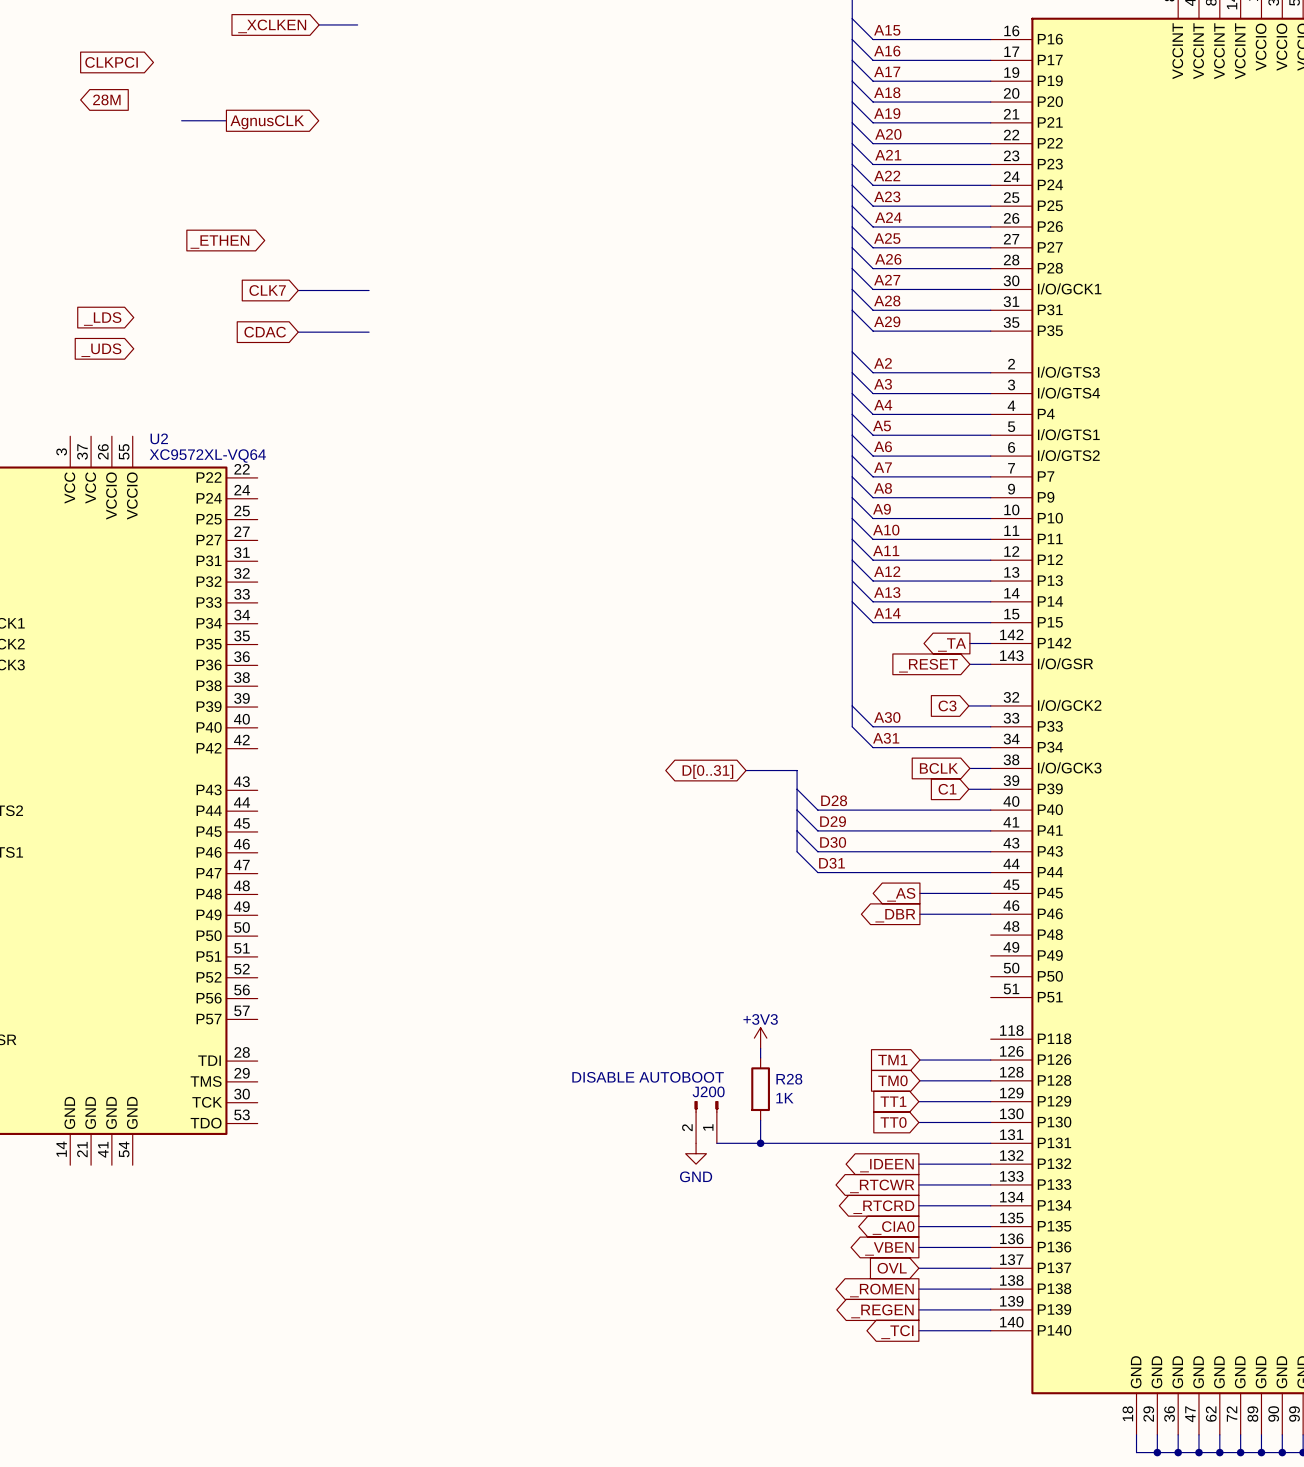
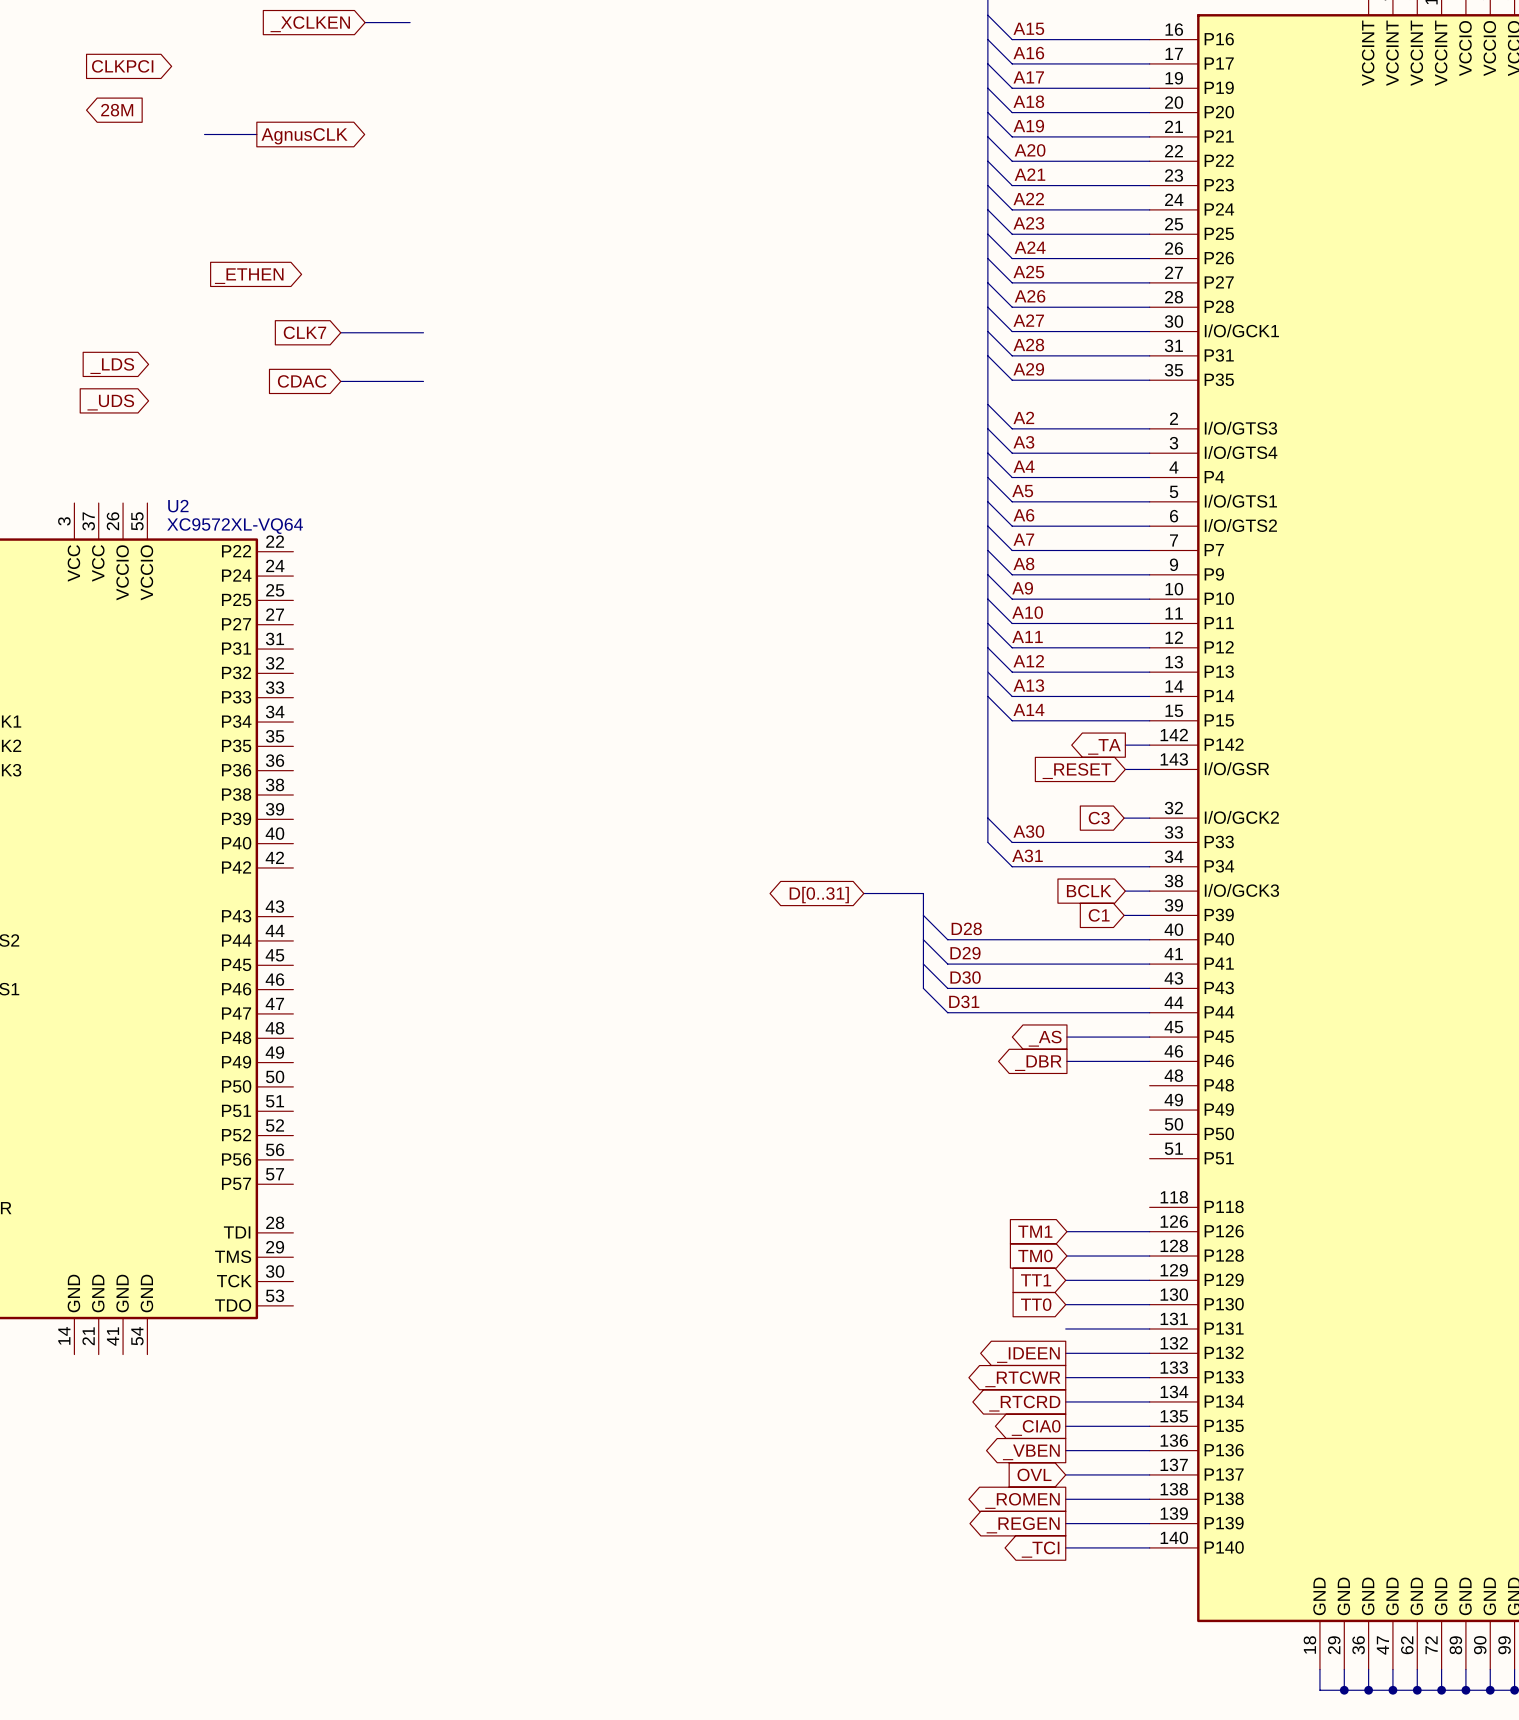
power symbol: +3V3 (760, 1038) -> none
wire: (760, 1048) (760, 1057) -> none
R28: 1K (760, 1089) -> none
wire: (760, 1120) (760, 1143) -> none
J200: DISABLE AUTOBOOT (706, 1122) -> none
wire: (716, 1143) (918, 1143) -> none
junction: (760, 1143) -> none
power symbol: GND (696, 1153) -> none

